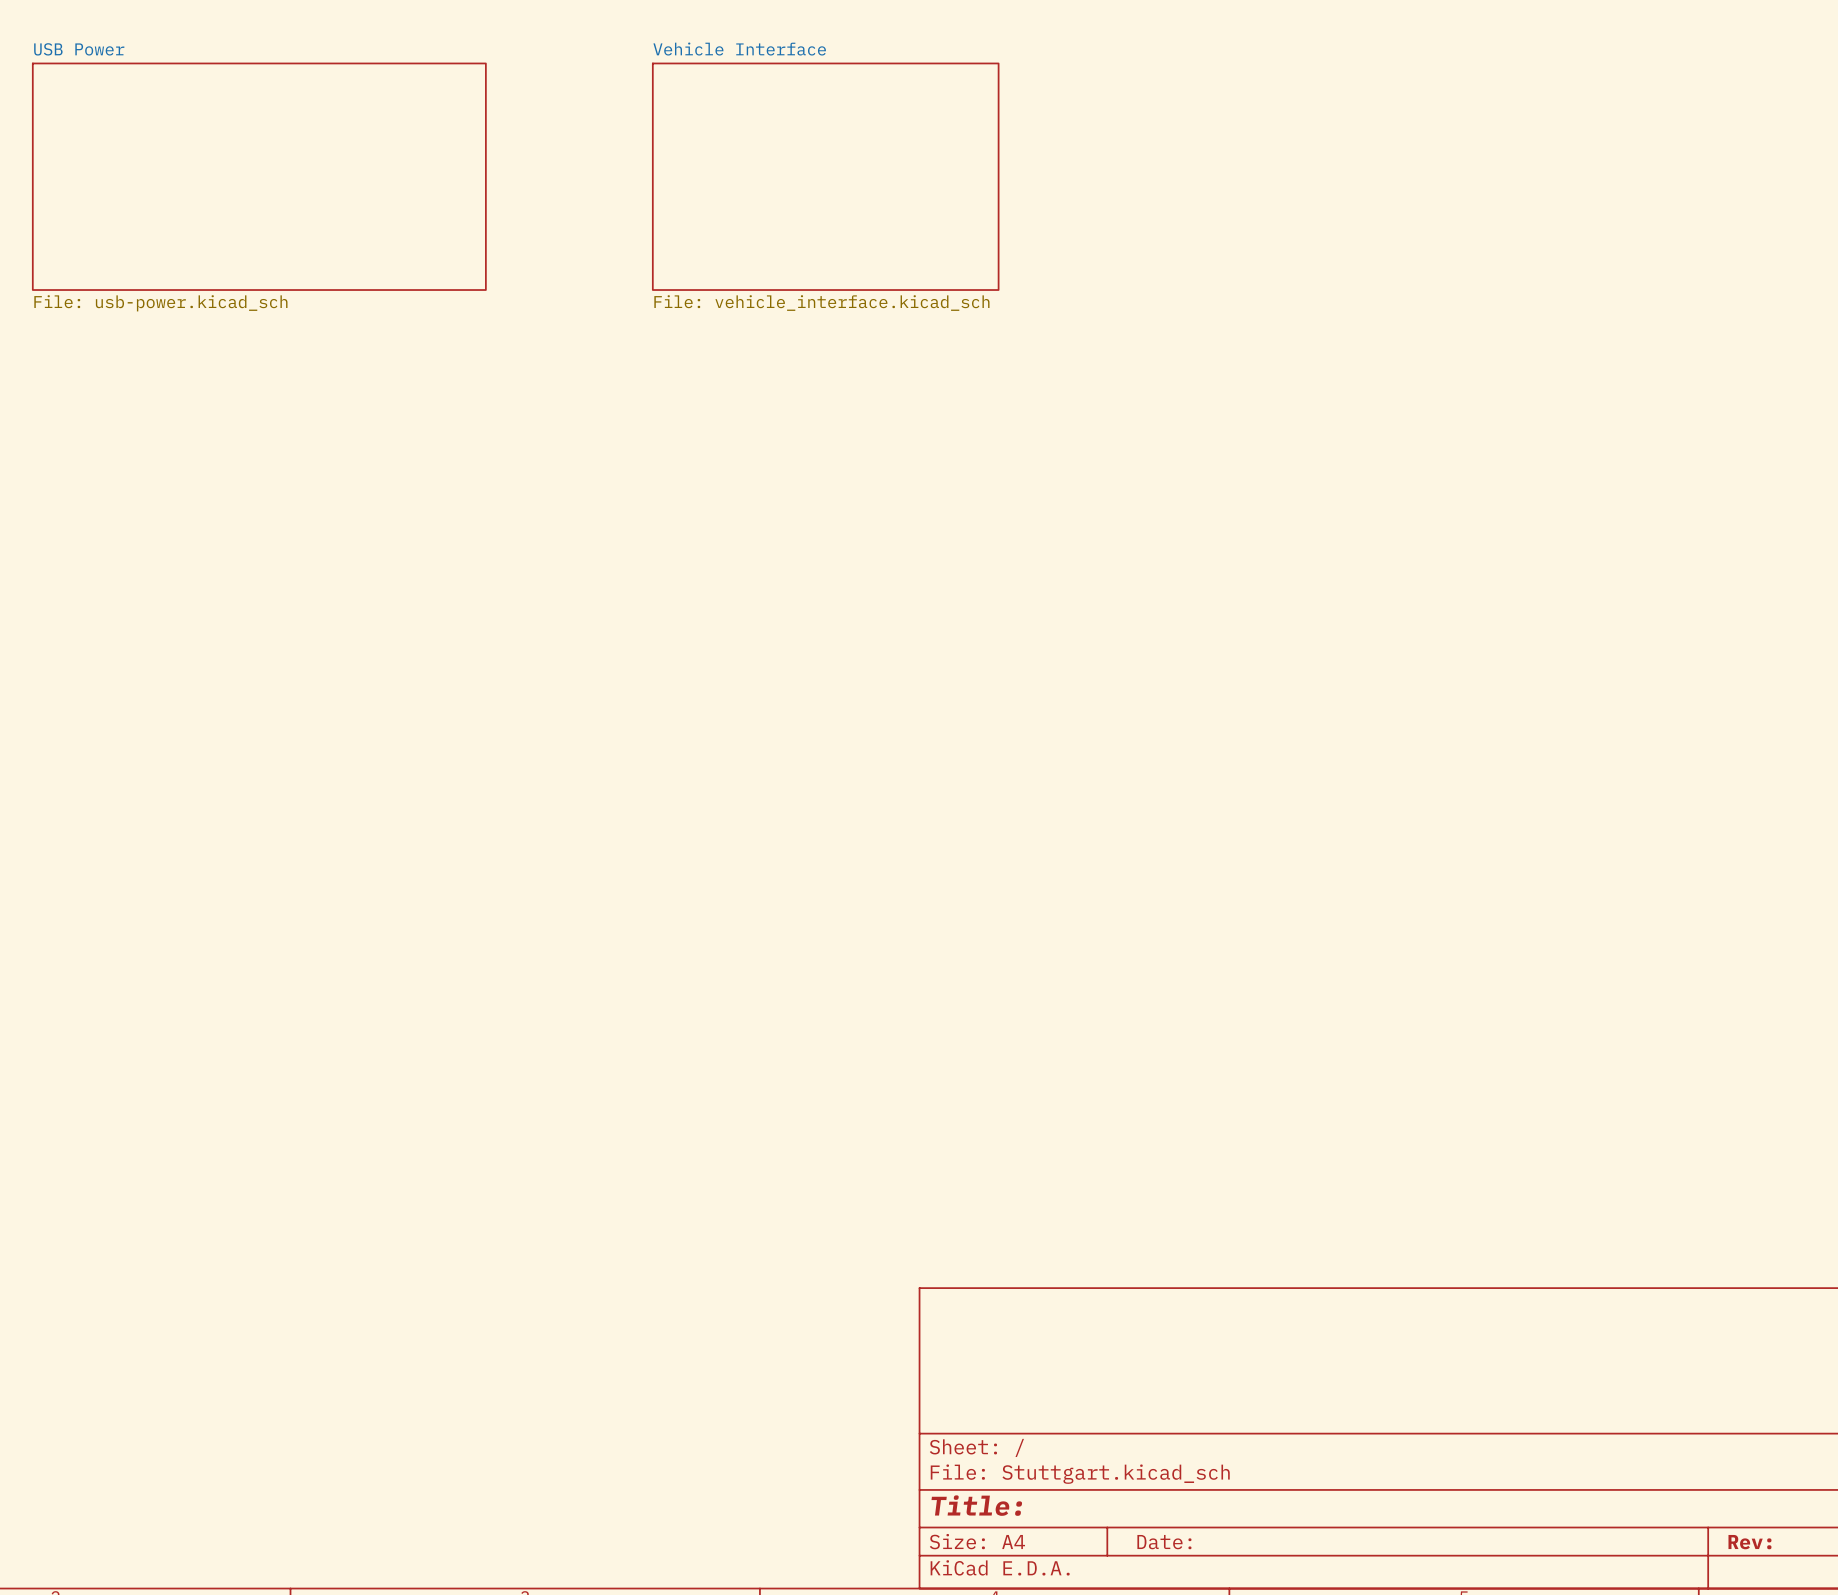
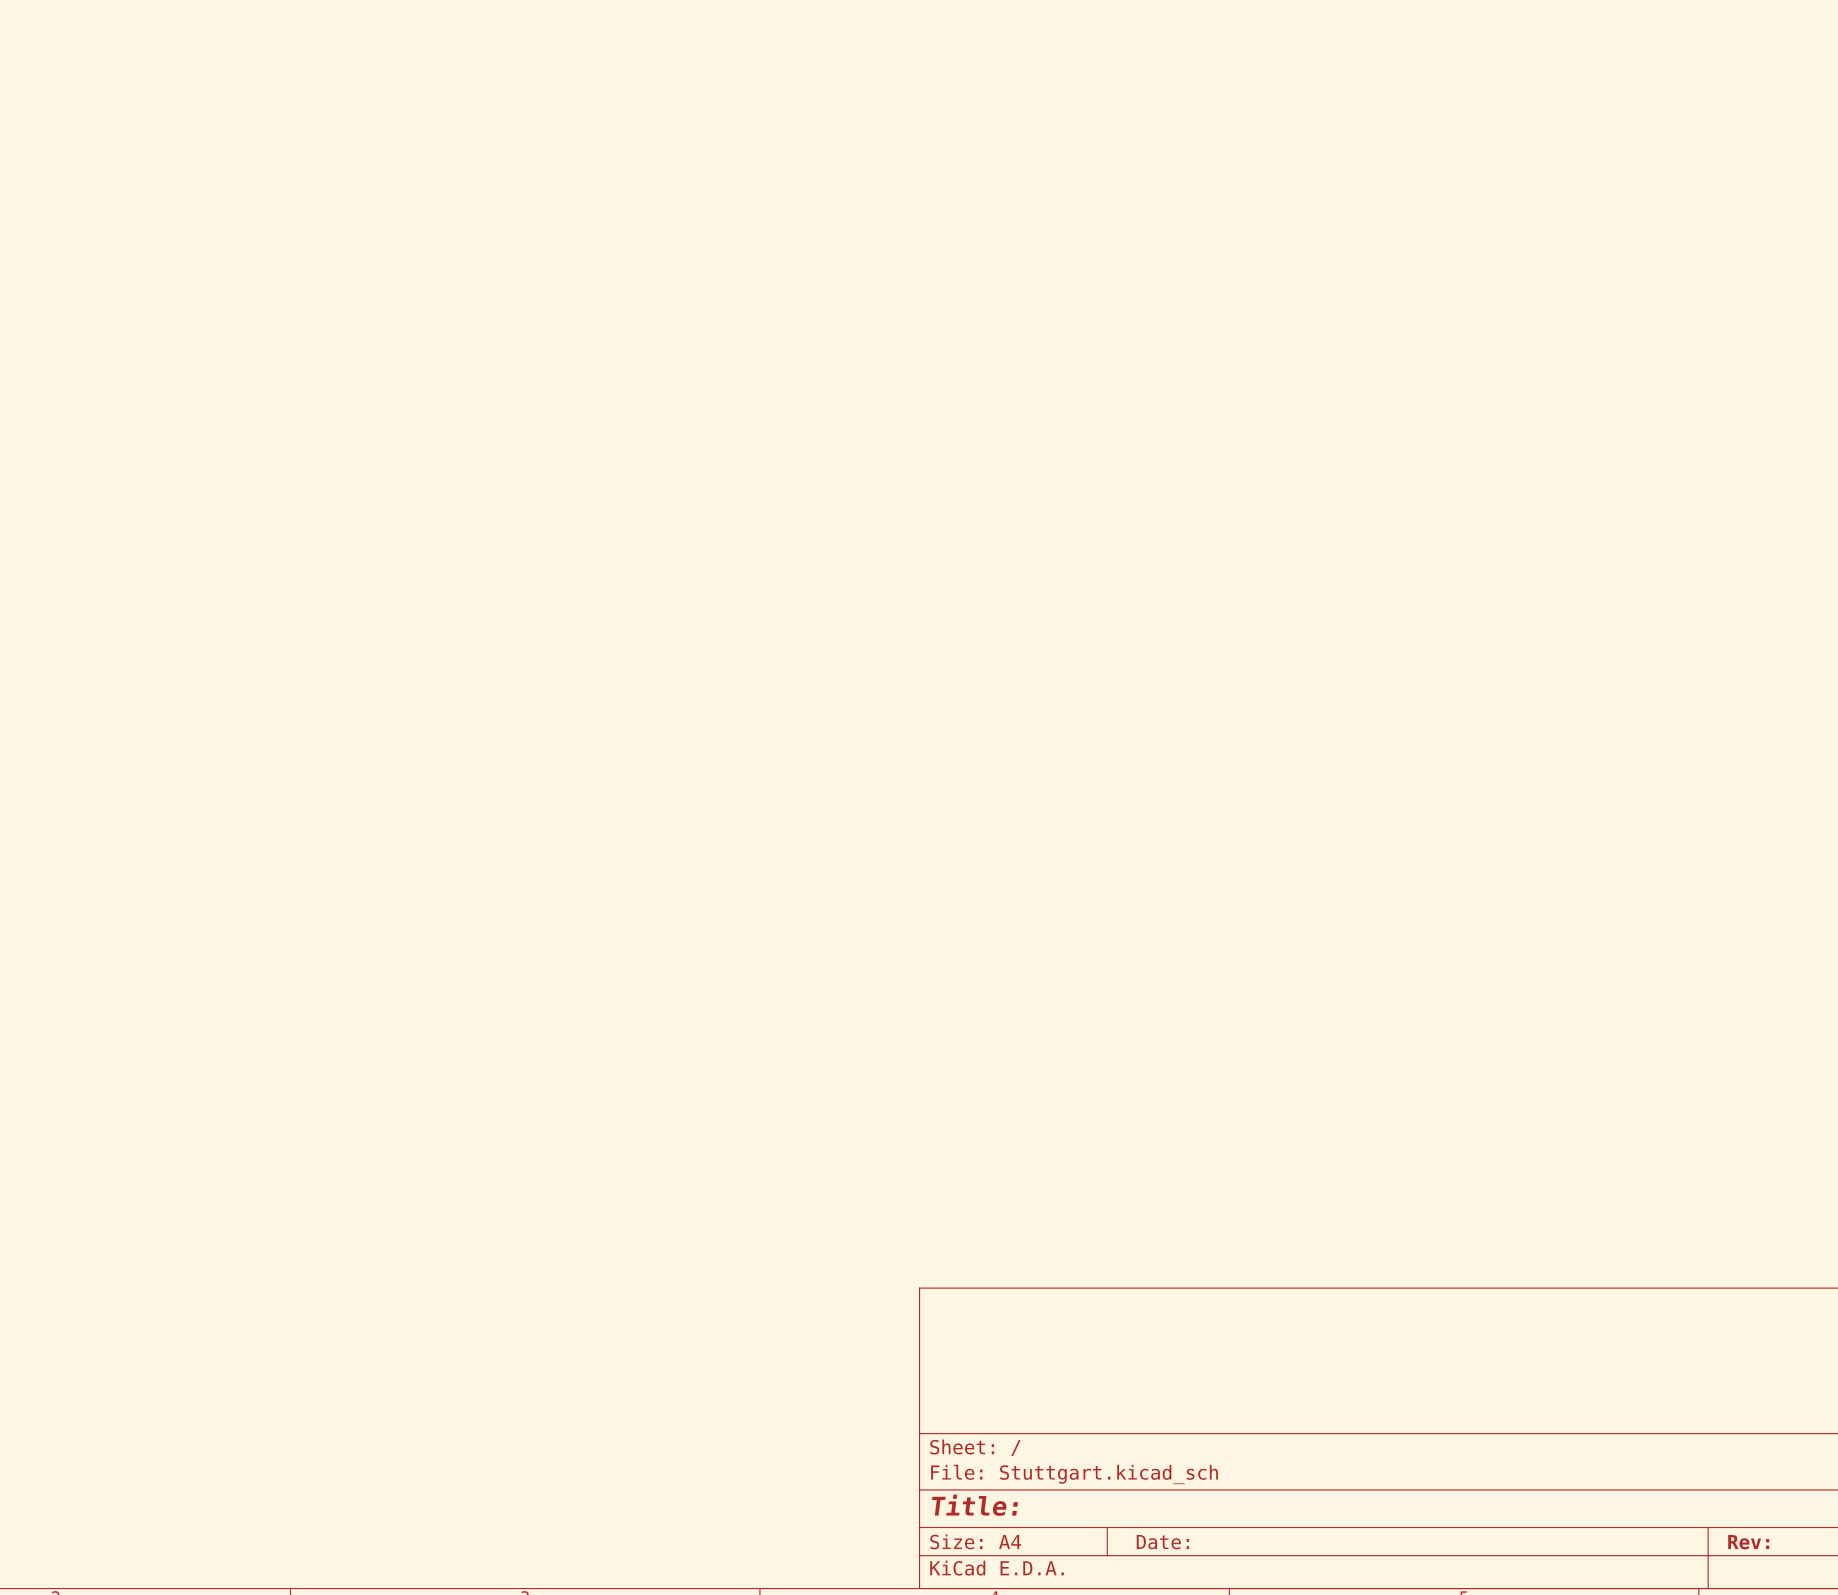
sheet USB Power: File: usb-power.kicad_sch (259, 176) -> none
sheet Vehicle Interface: File: vehicle_interface.kicad_sch (825, 176) -> none

